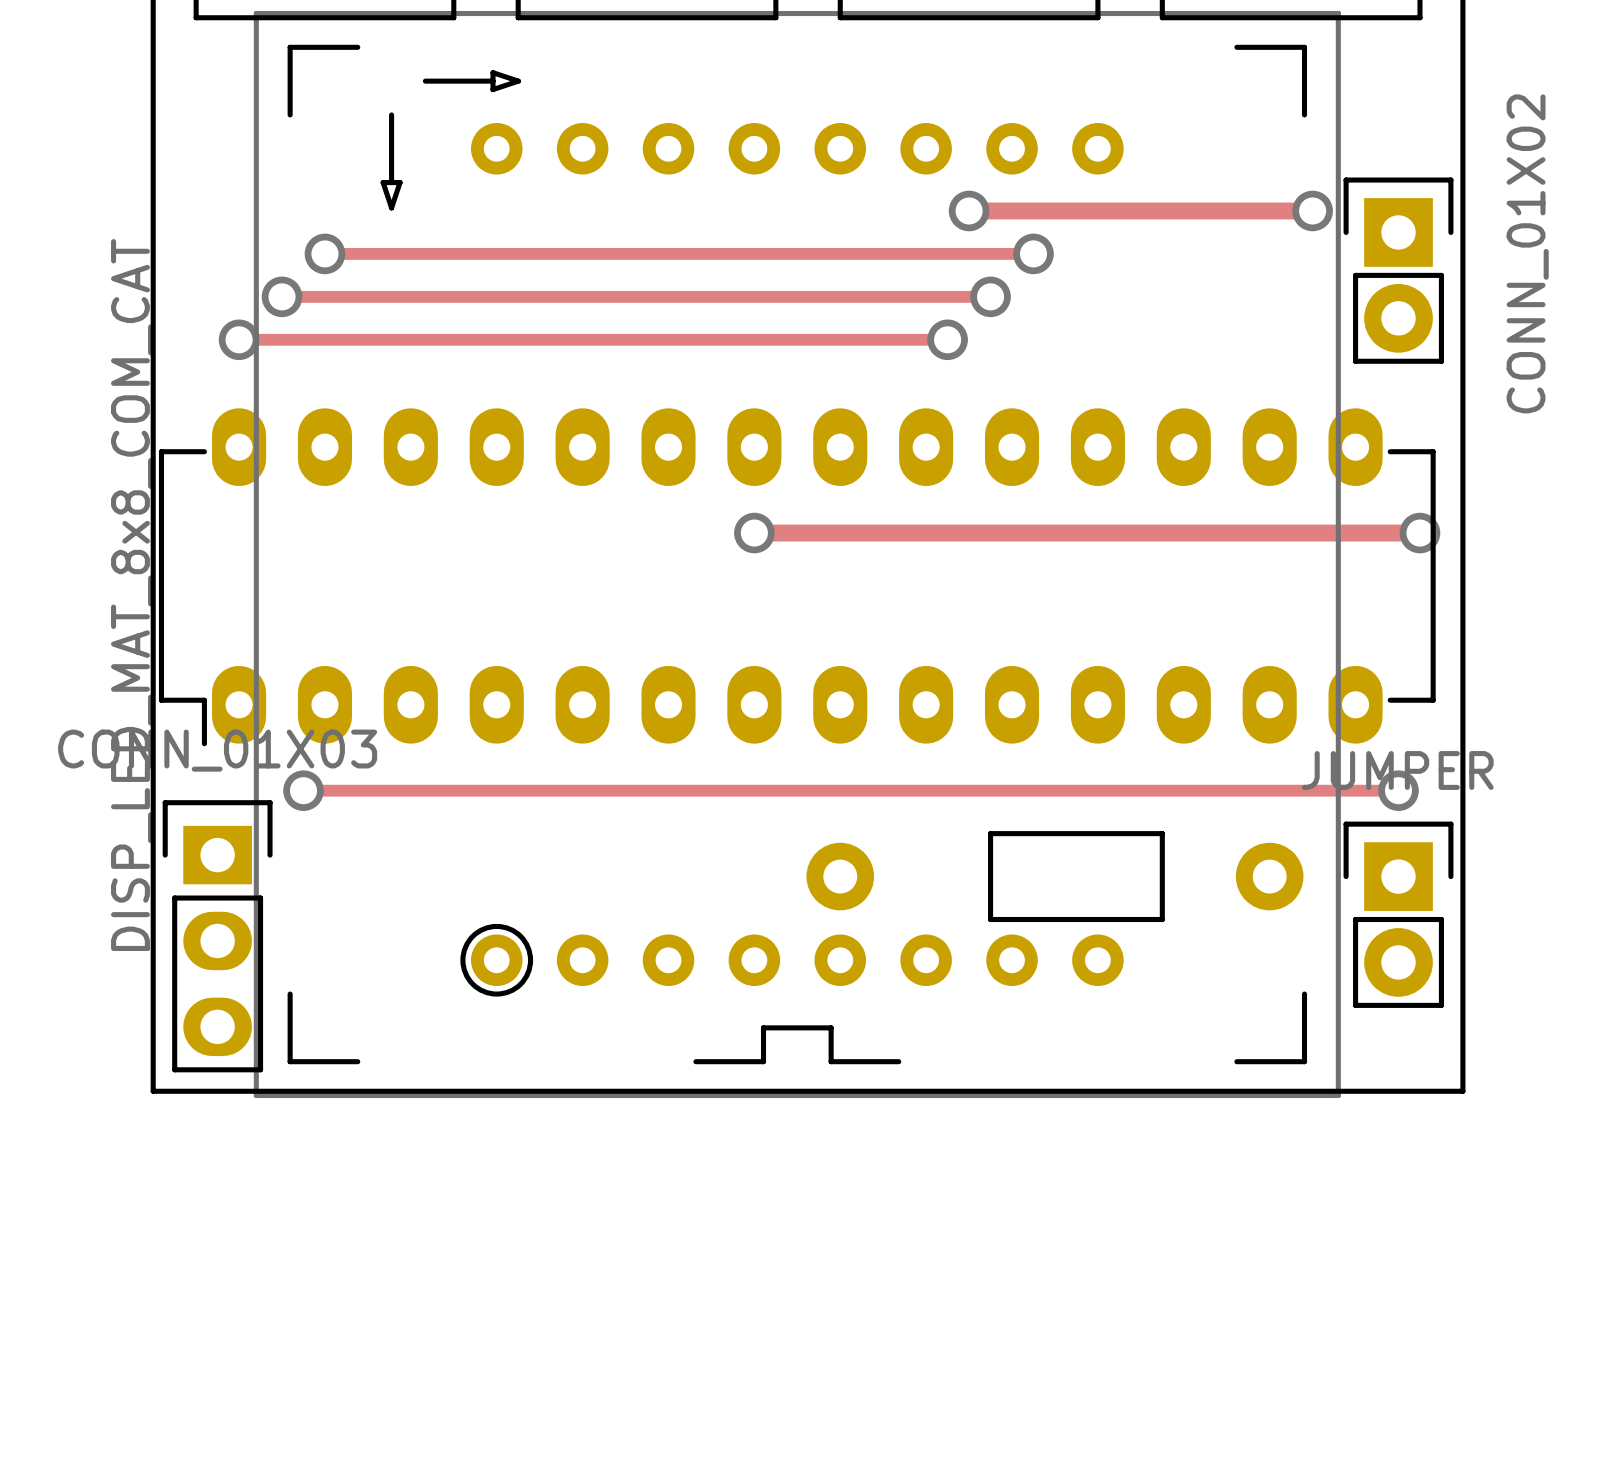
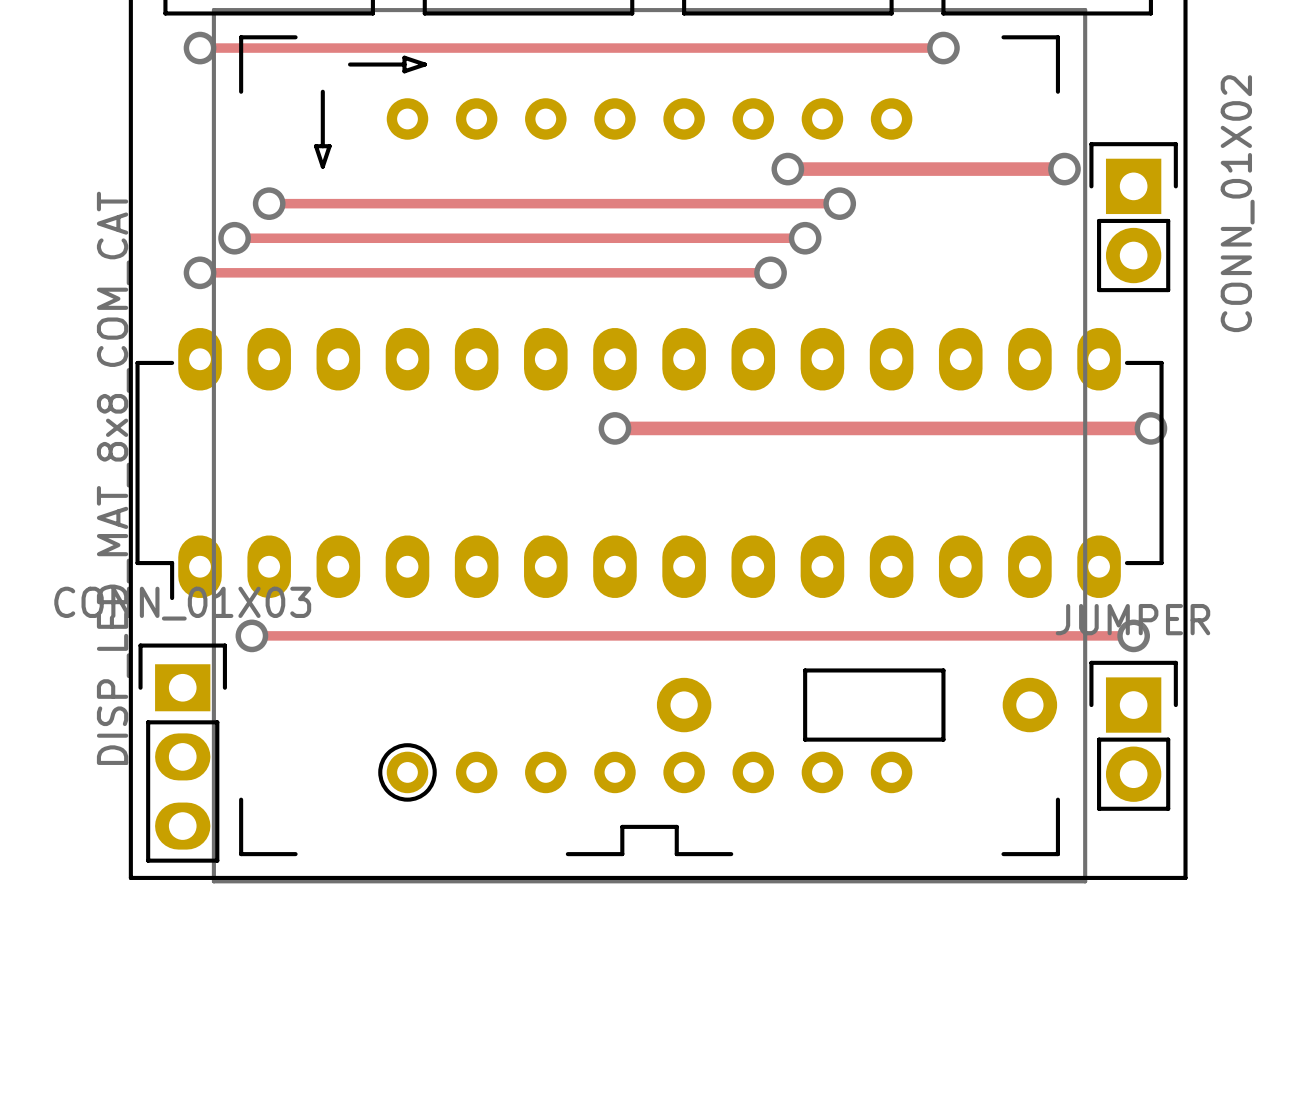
track: none -> (200, 48) (943, 48)
via: none -> (200, 48)
via: none -> (943, 48)

